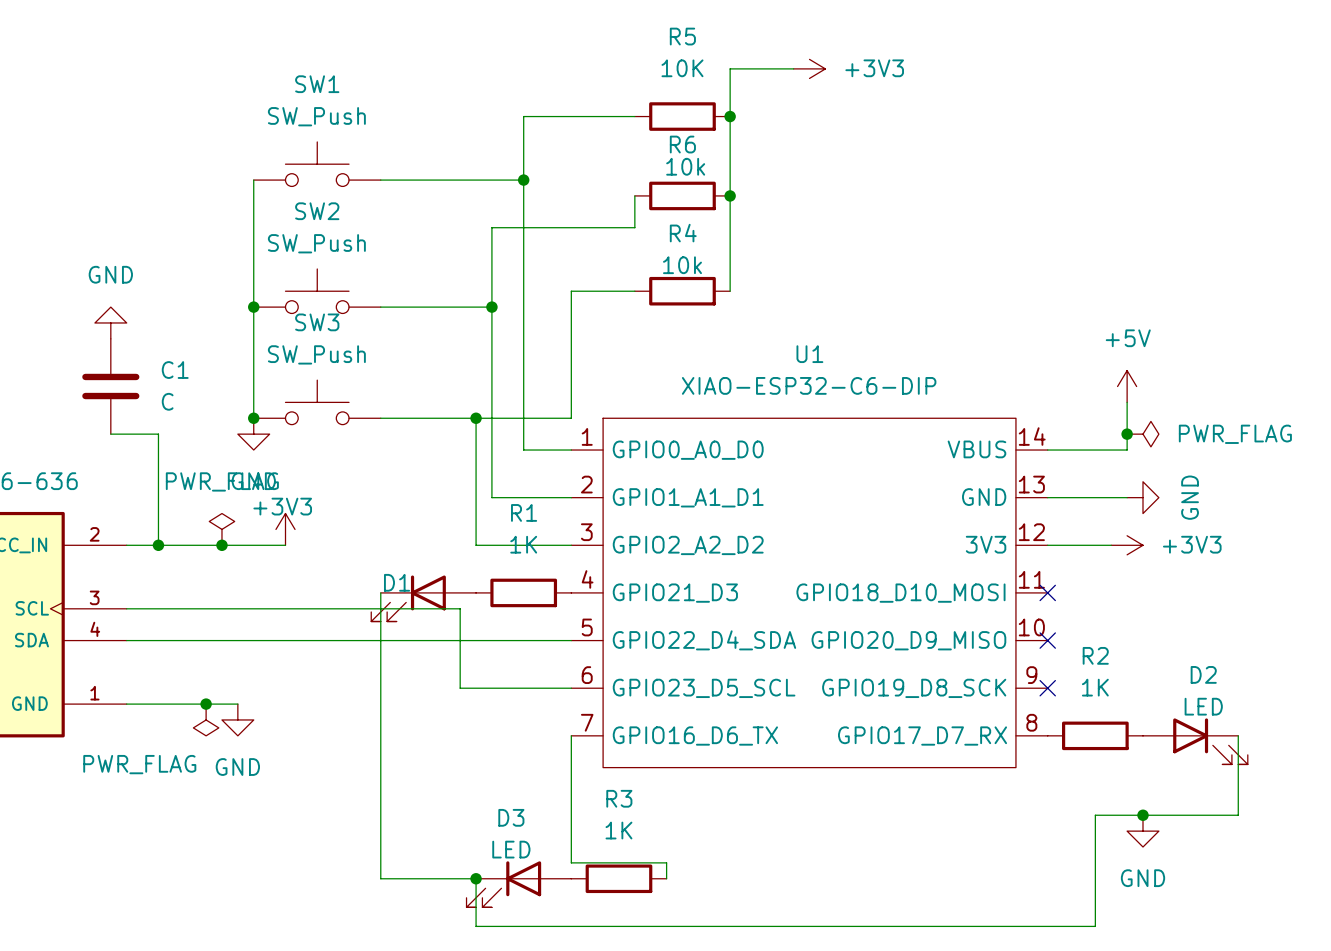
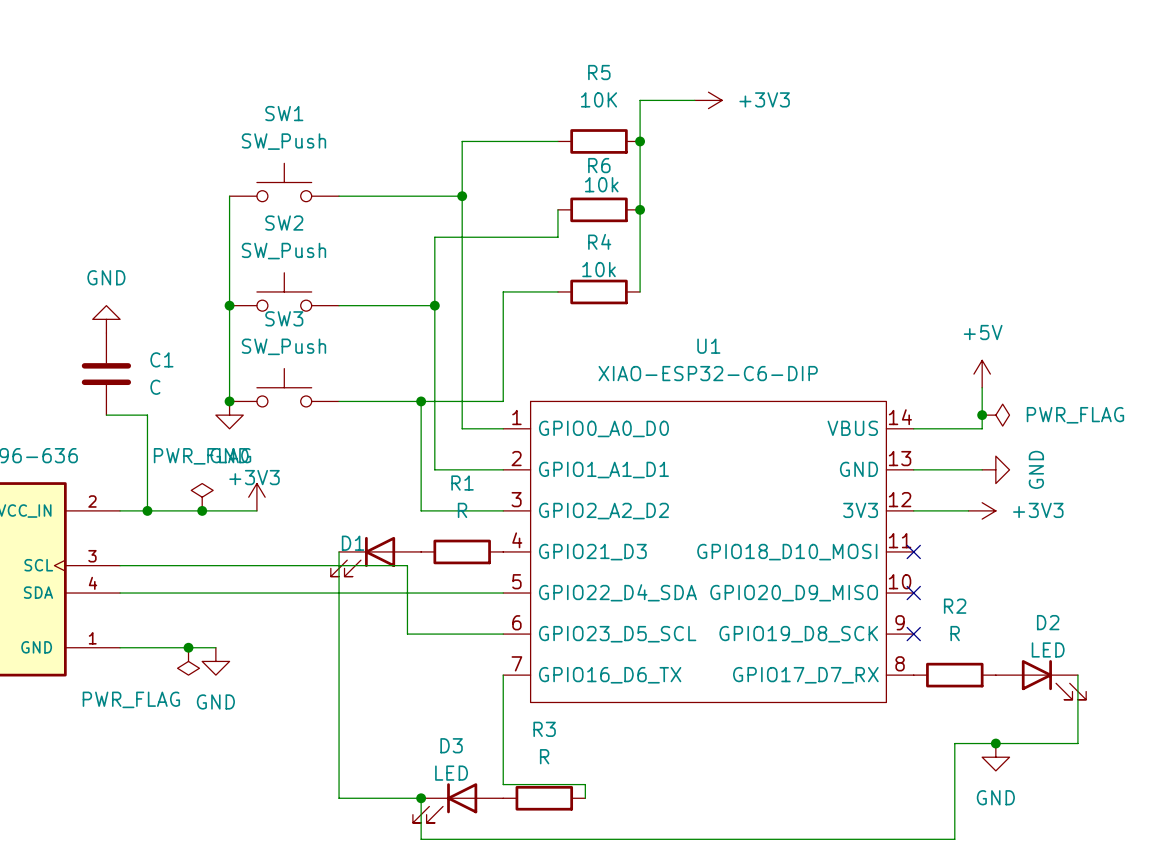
R1 value: 1K (523, 544) -> R (462, 510)
R2 value: 1K (1095, 687) -> R (955, 633)
R3 value: 1K (618, 830) -> R (544, 756)

